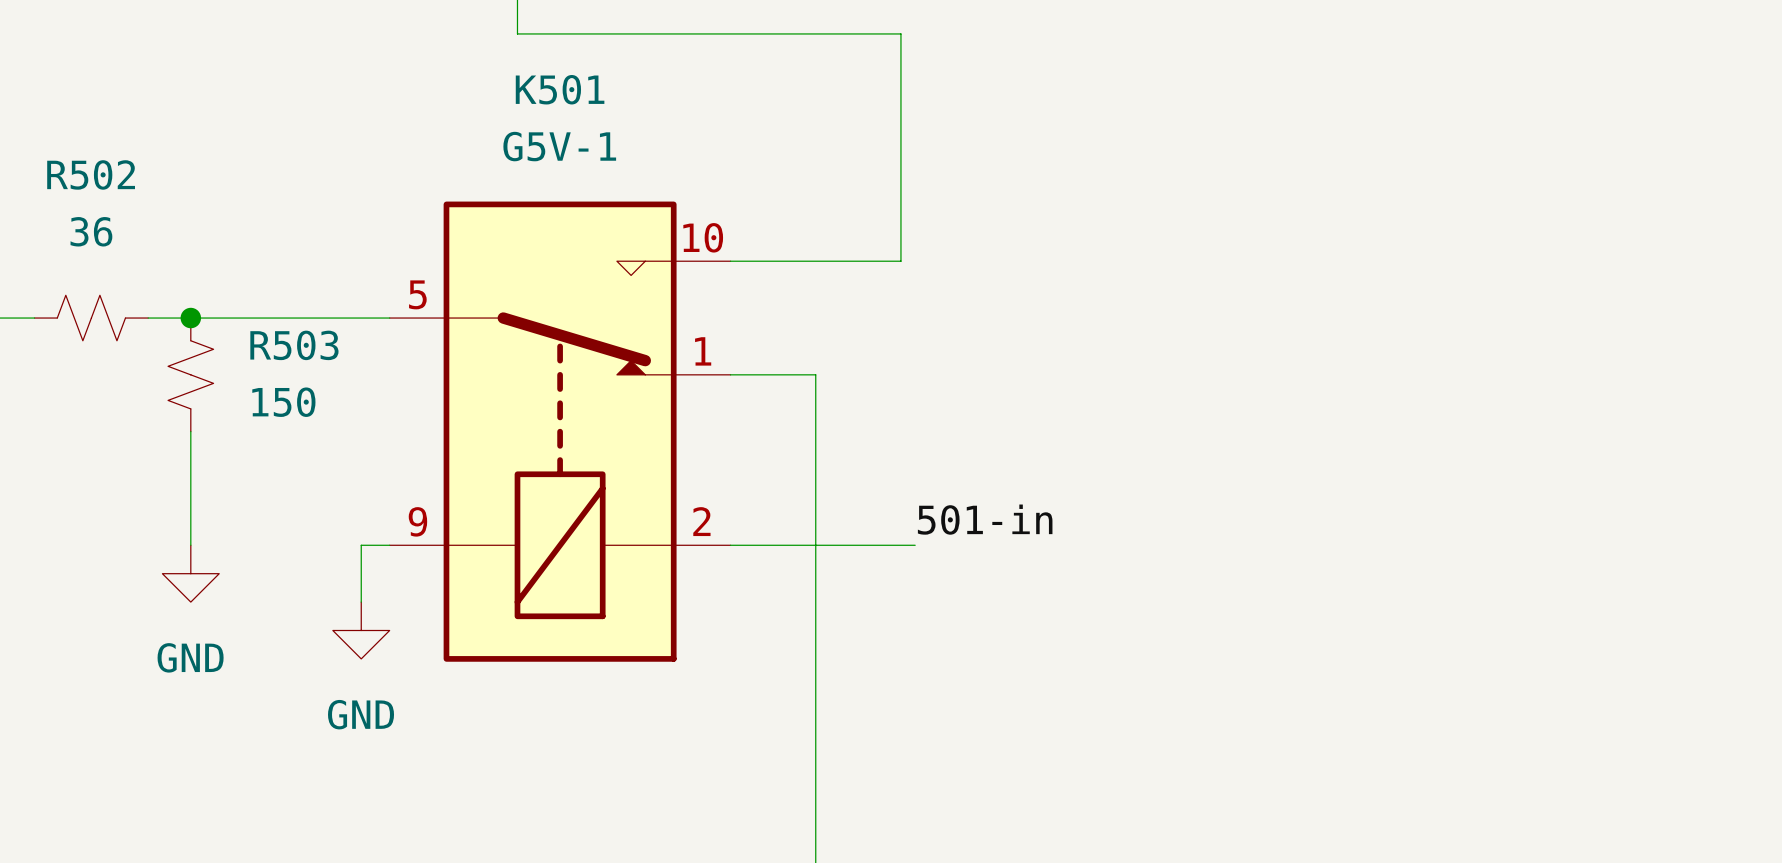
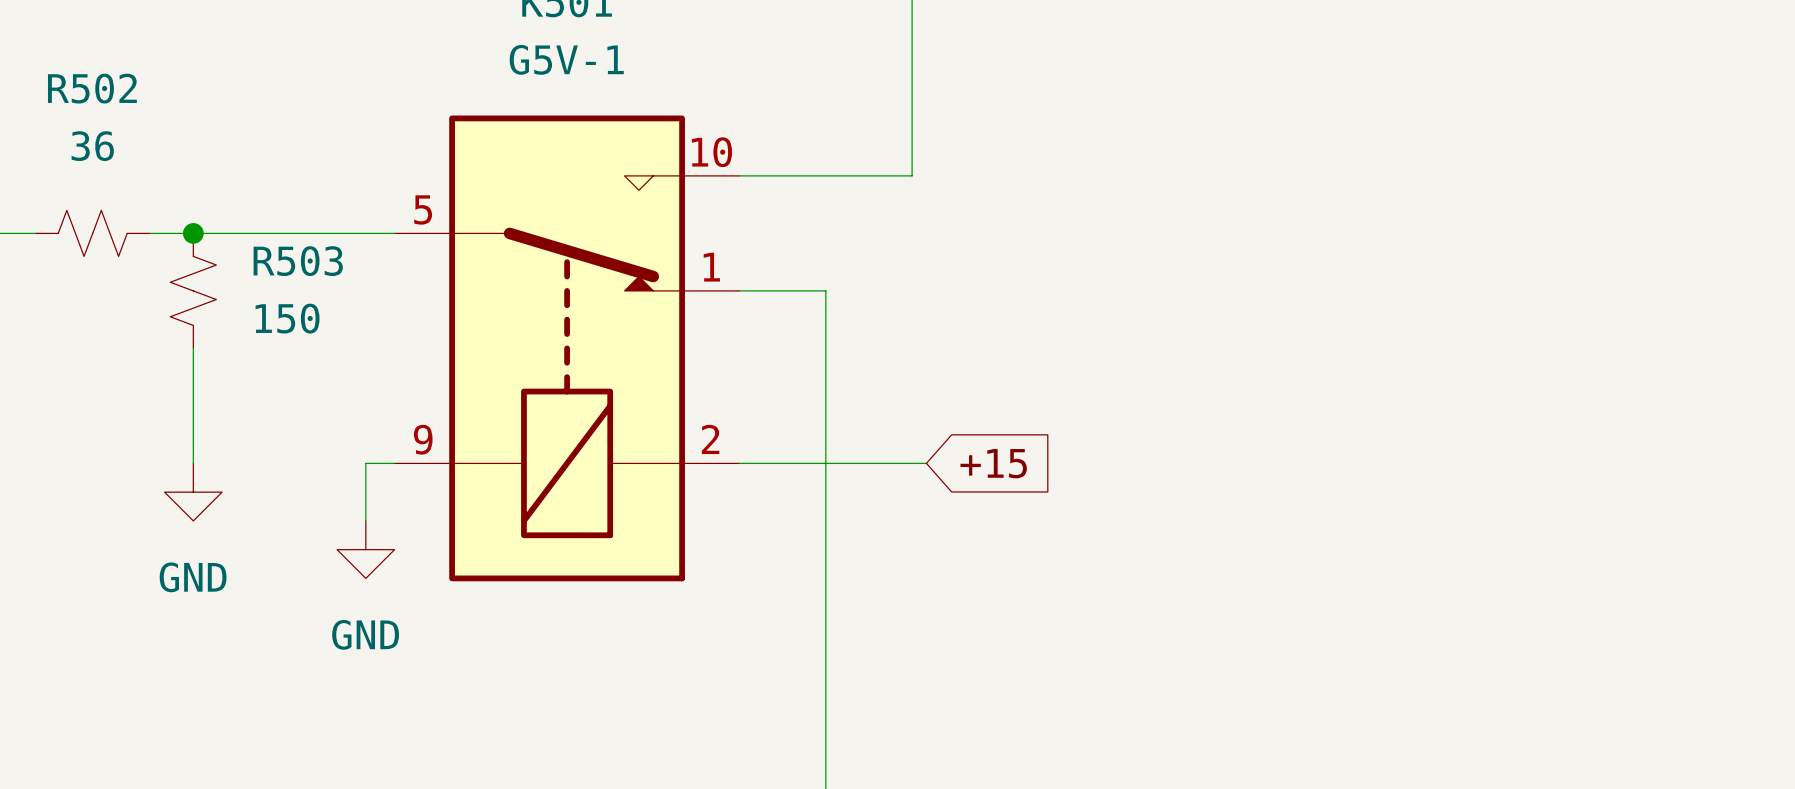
label: 501-in (985, 519) -> none
global label: none -> +15 (993, 463)

